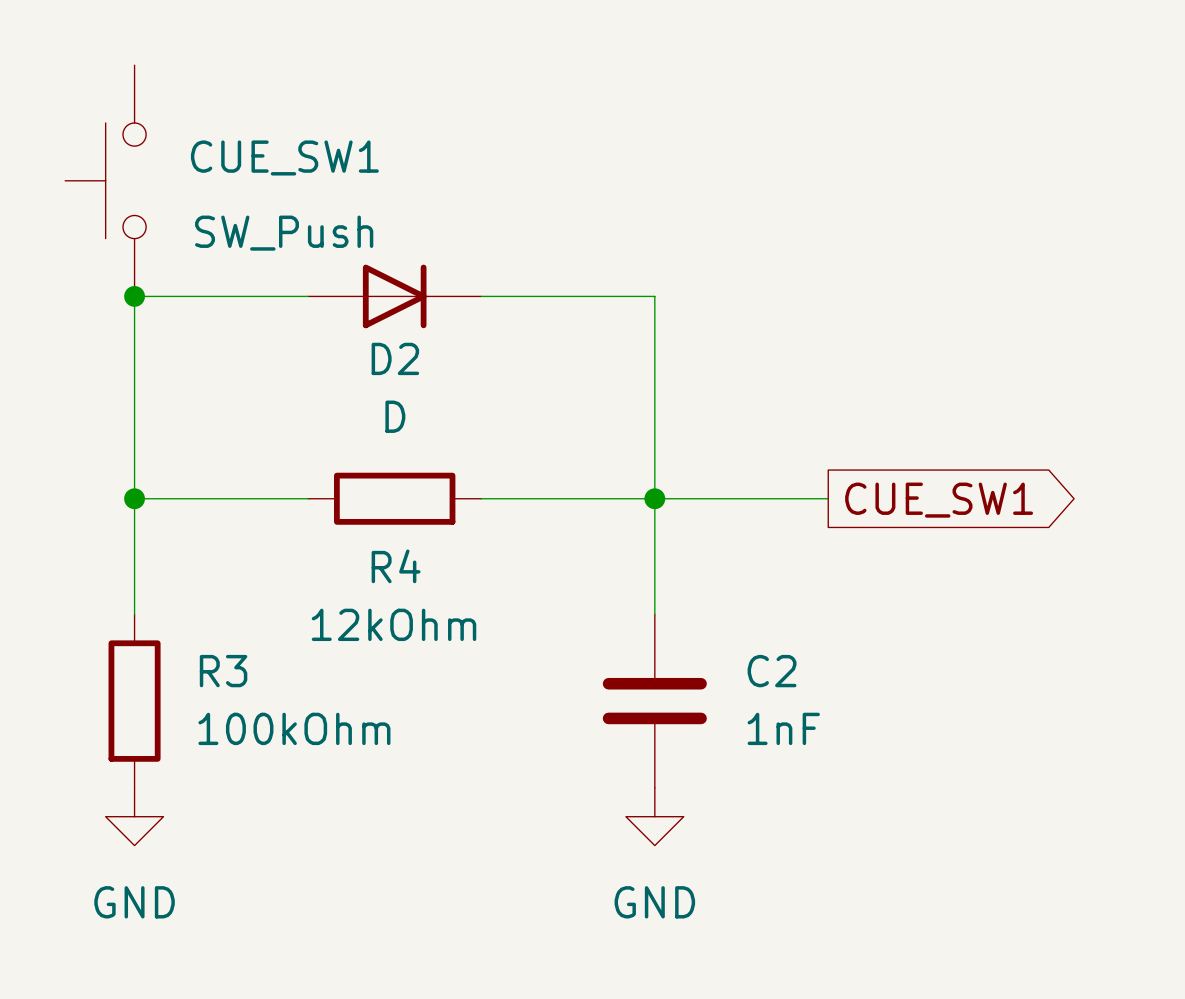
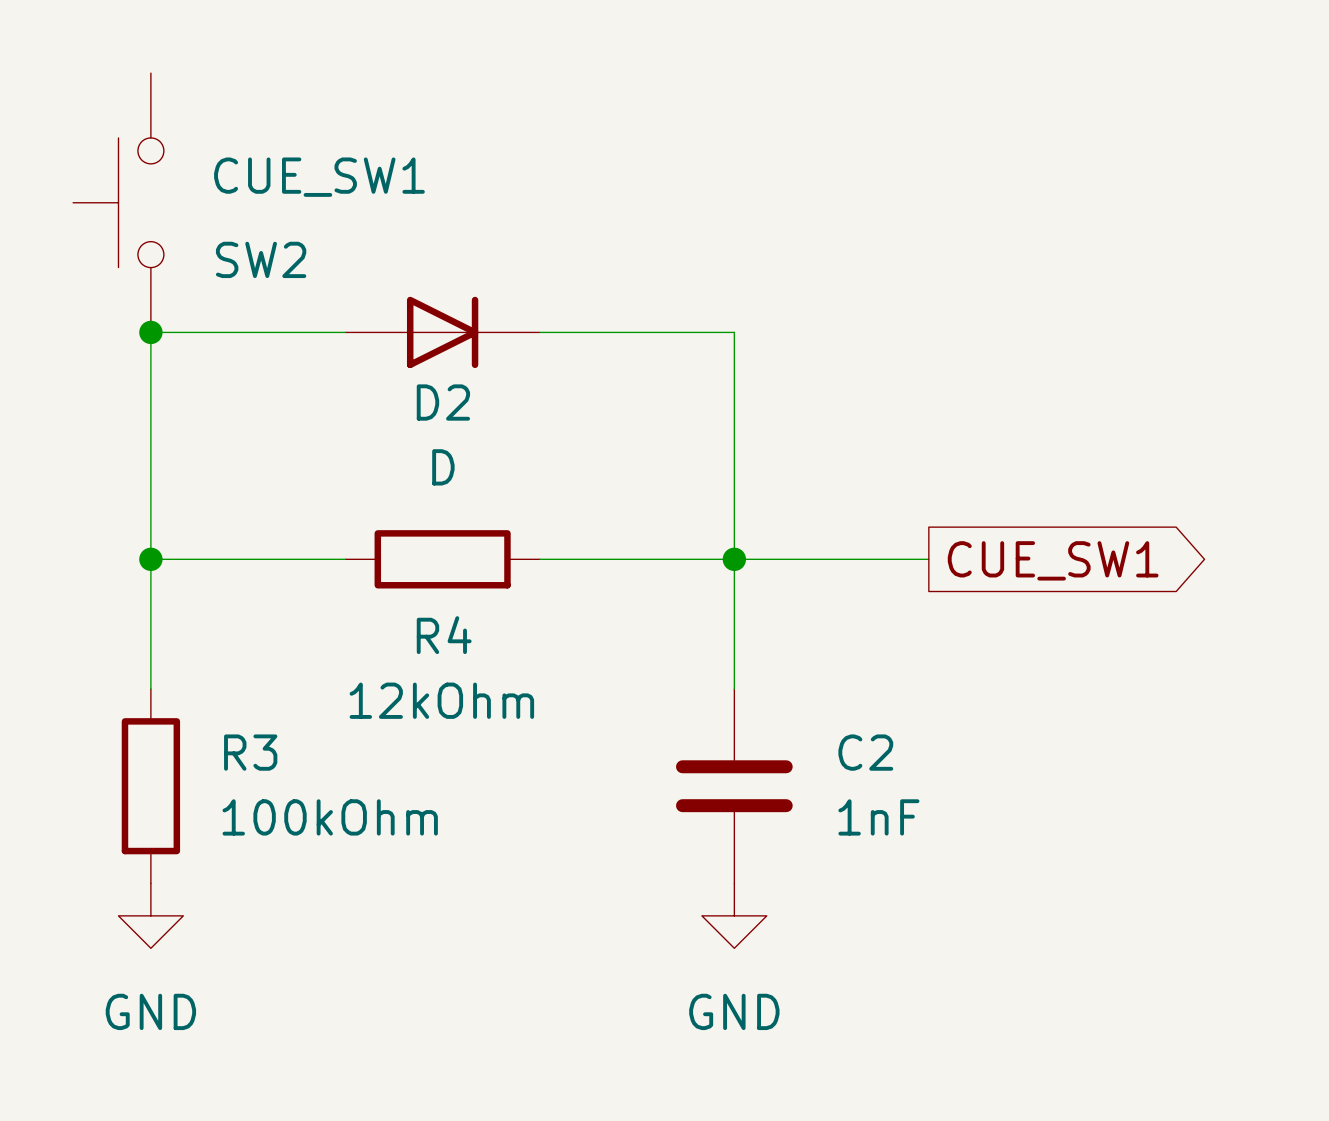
SW_Push name: SW_Push (284, 233) -> SW2 (261, 259)

